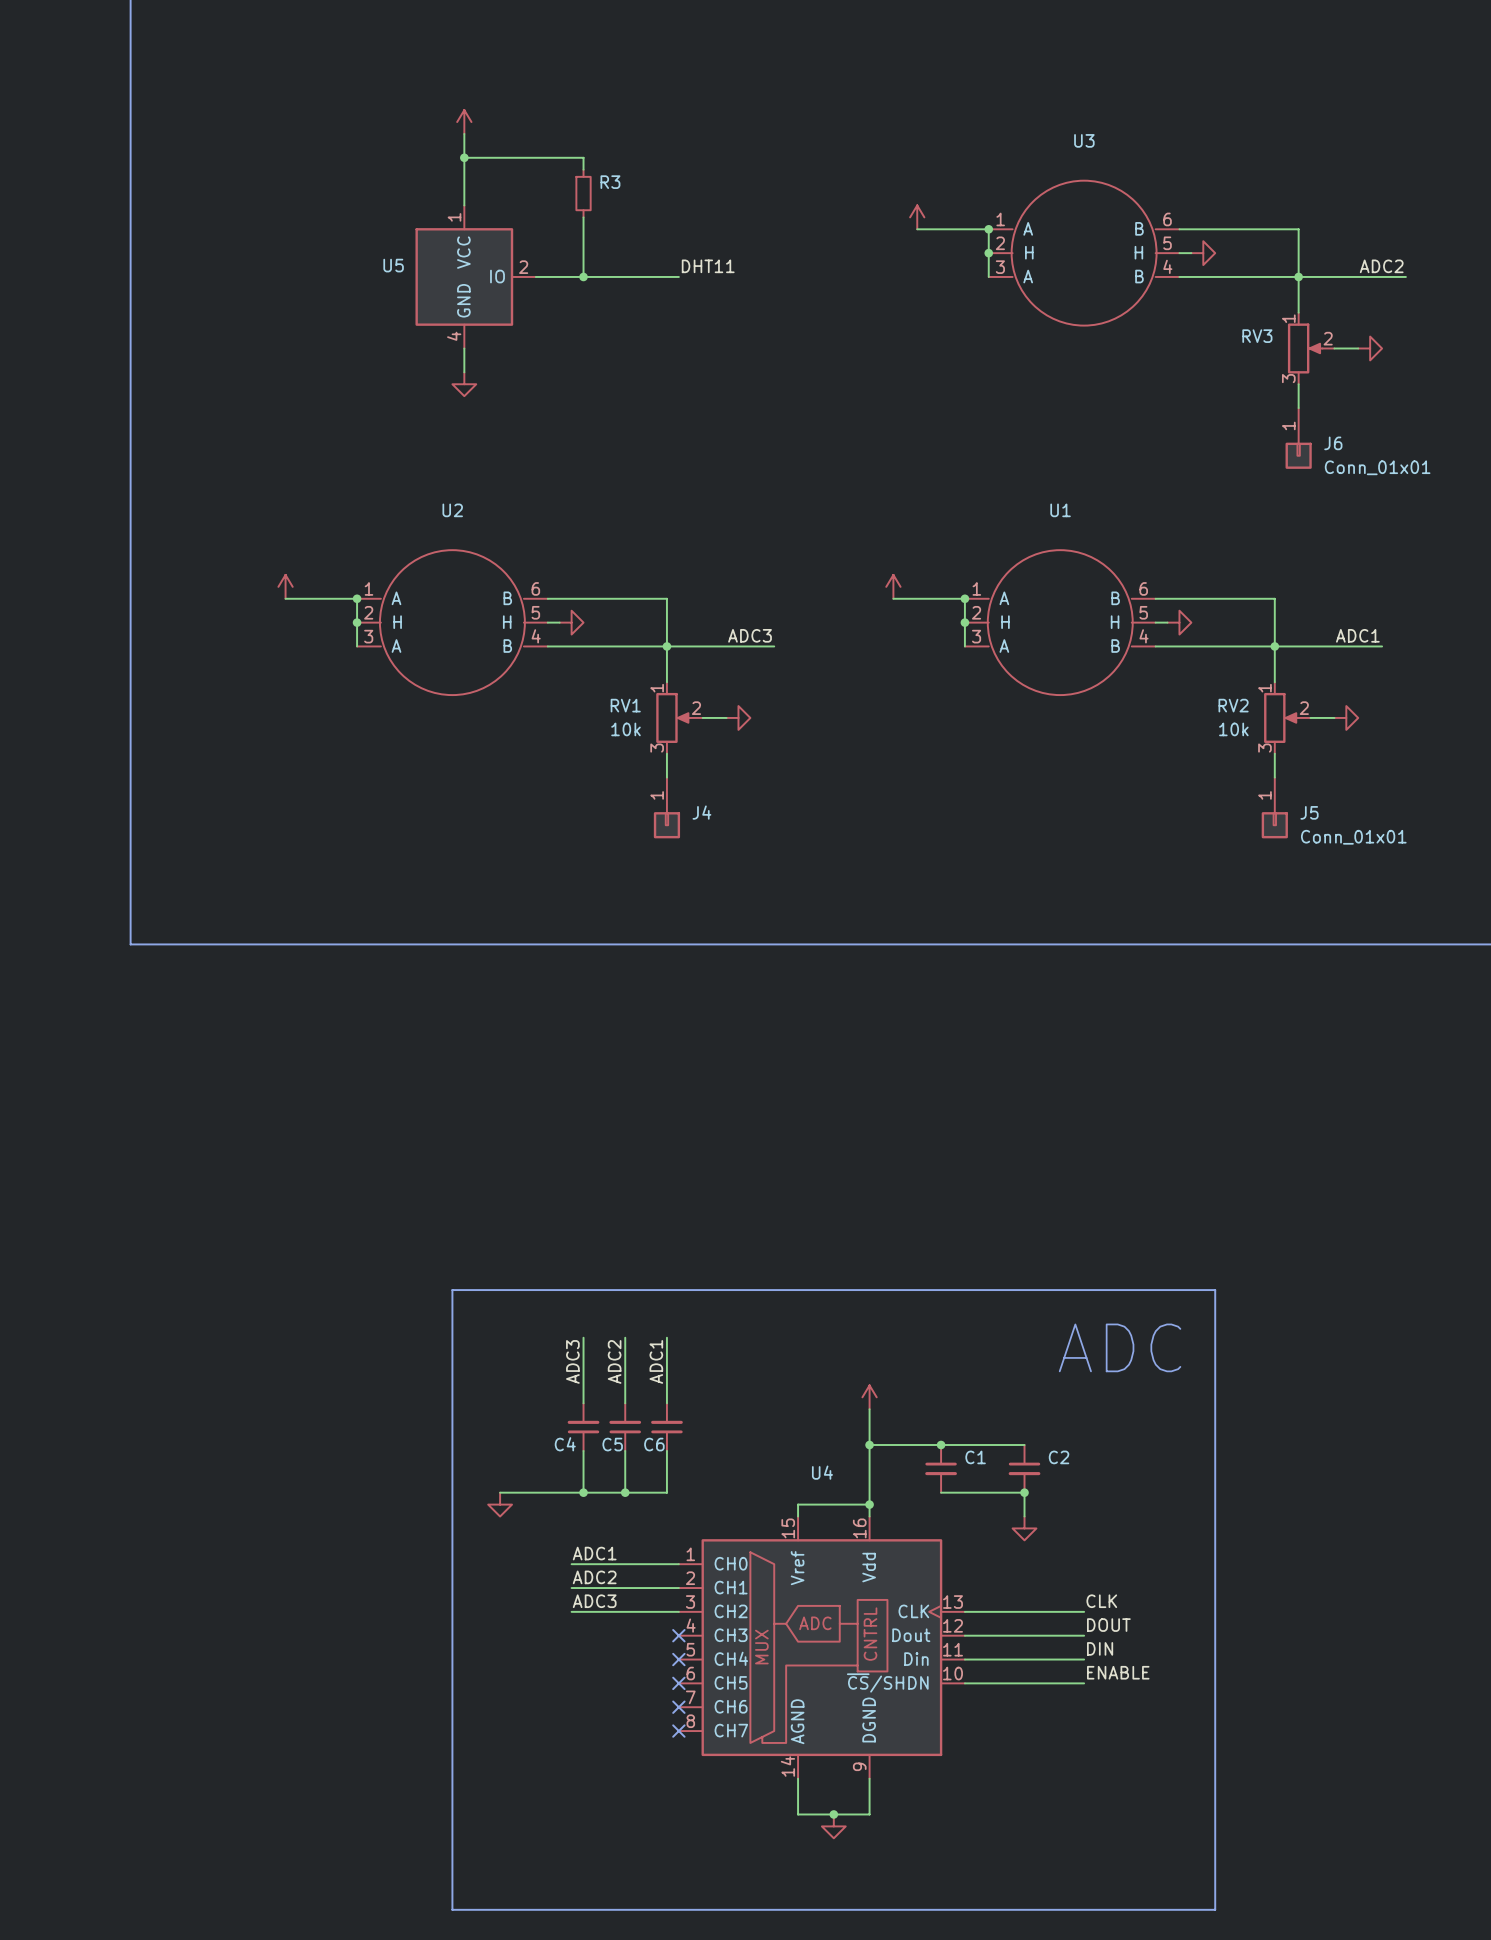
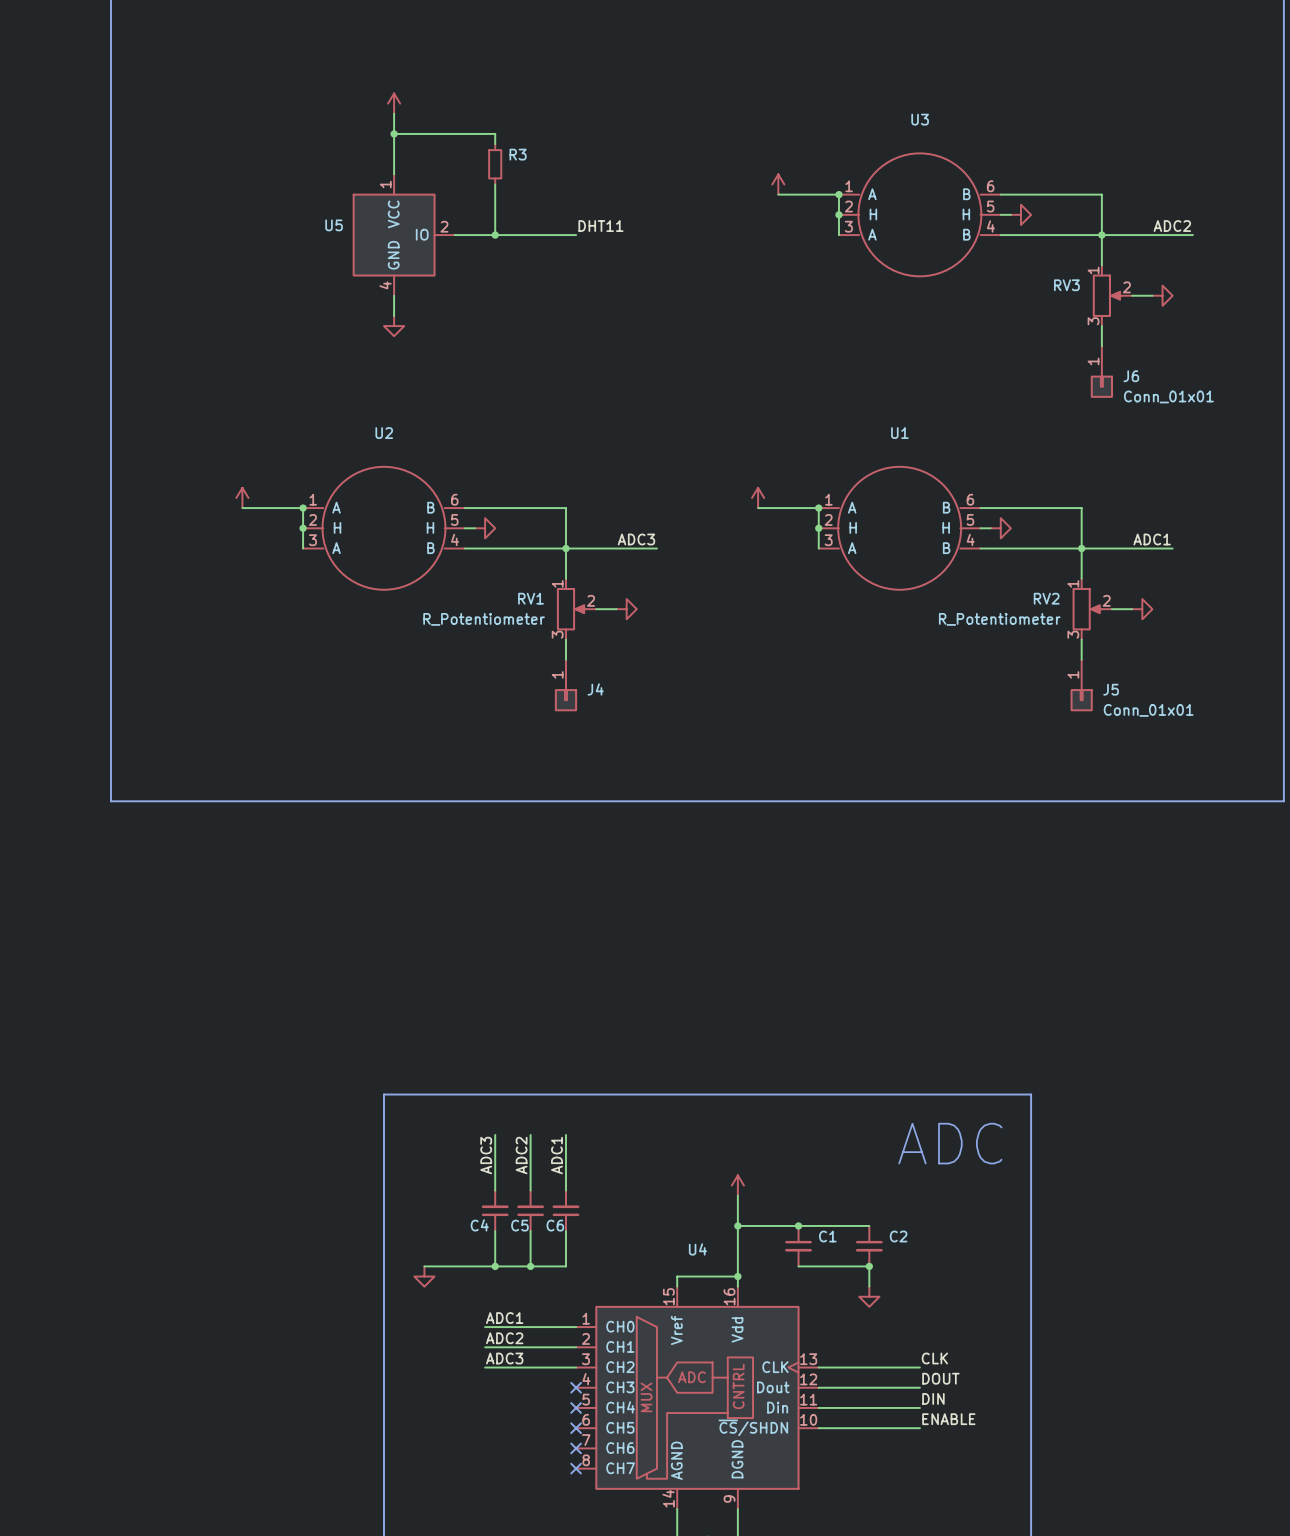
RV1 value: 10k (626, 729) -> R_Potentiometer (484, 619)
RV2 value: 10k (1233, 729) -> R_Potentiometer (999, 619)

